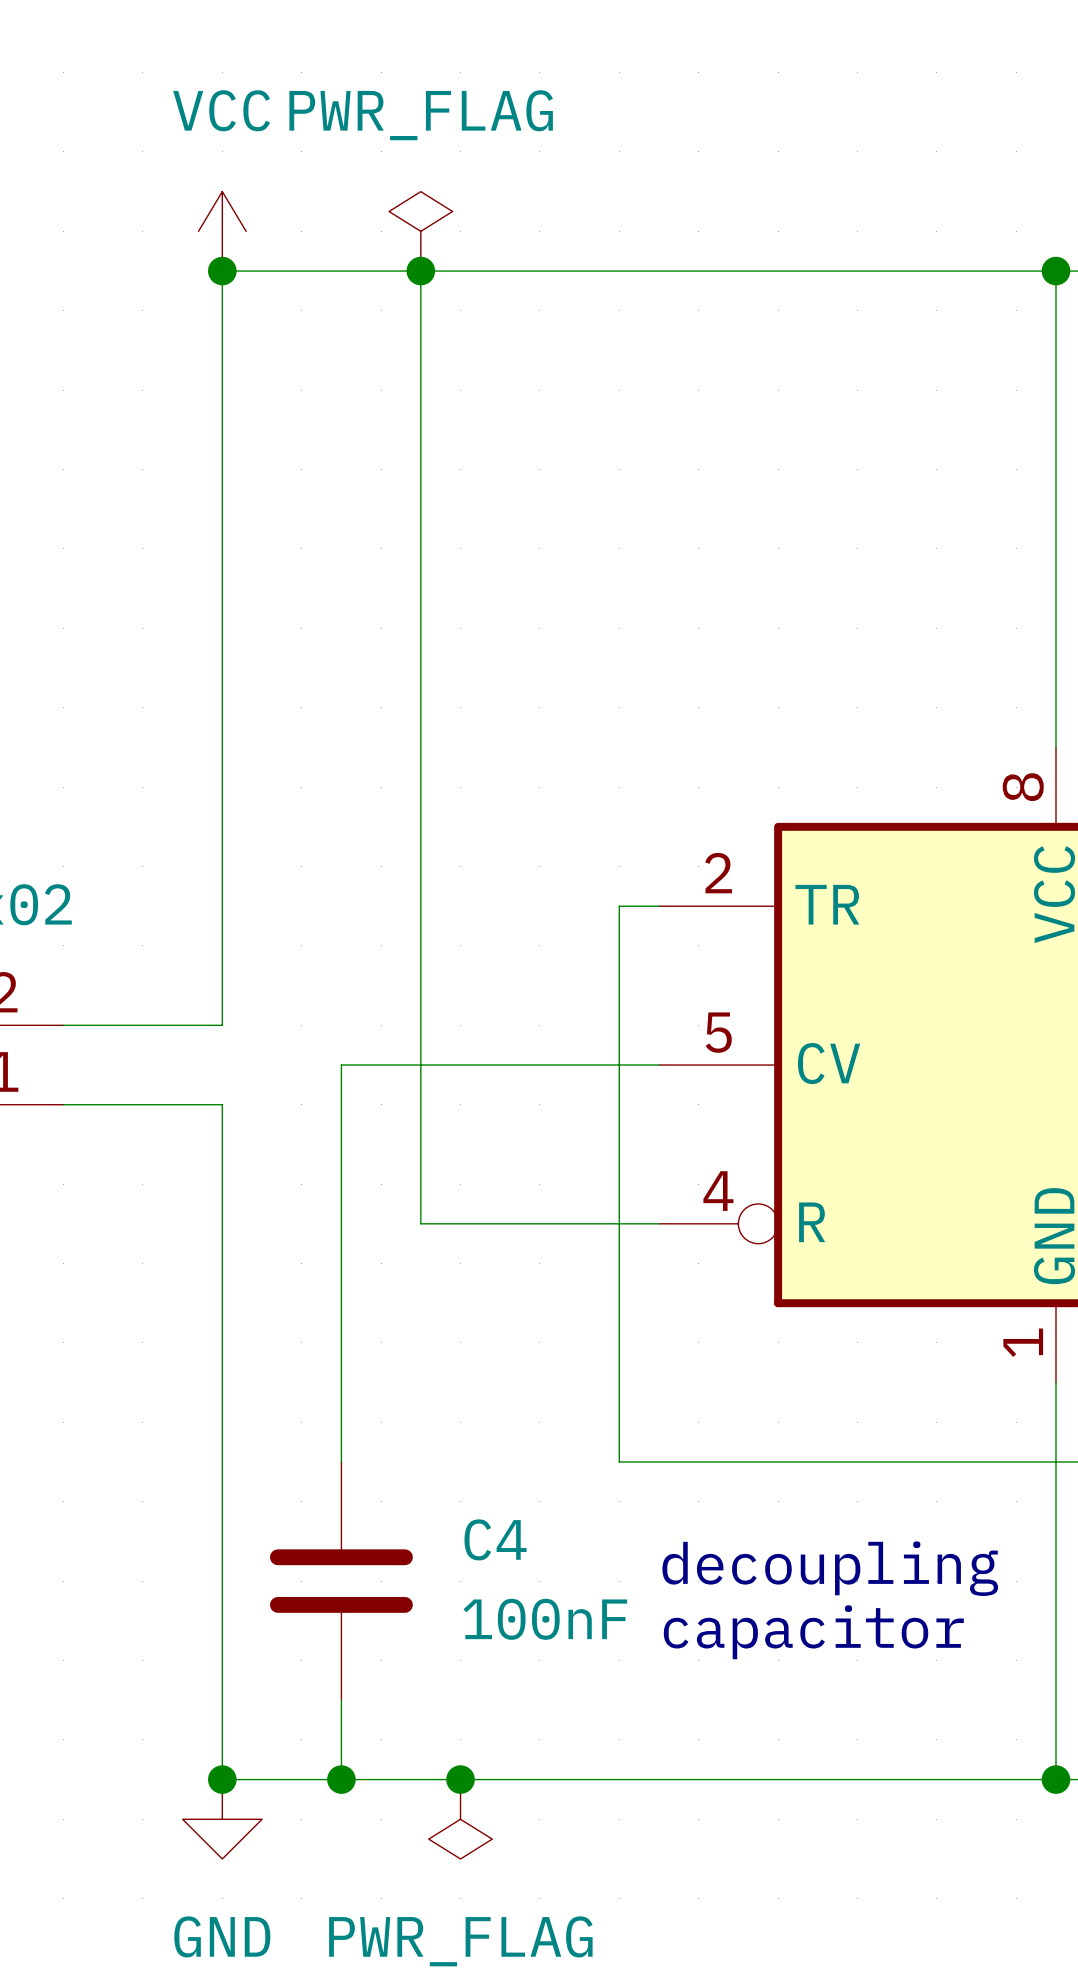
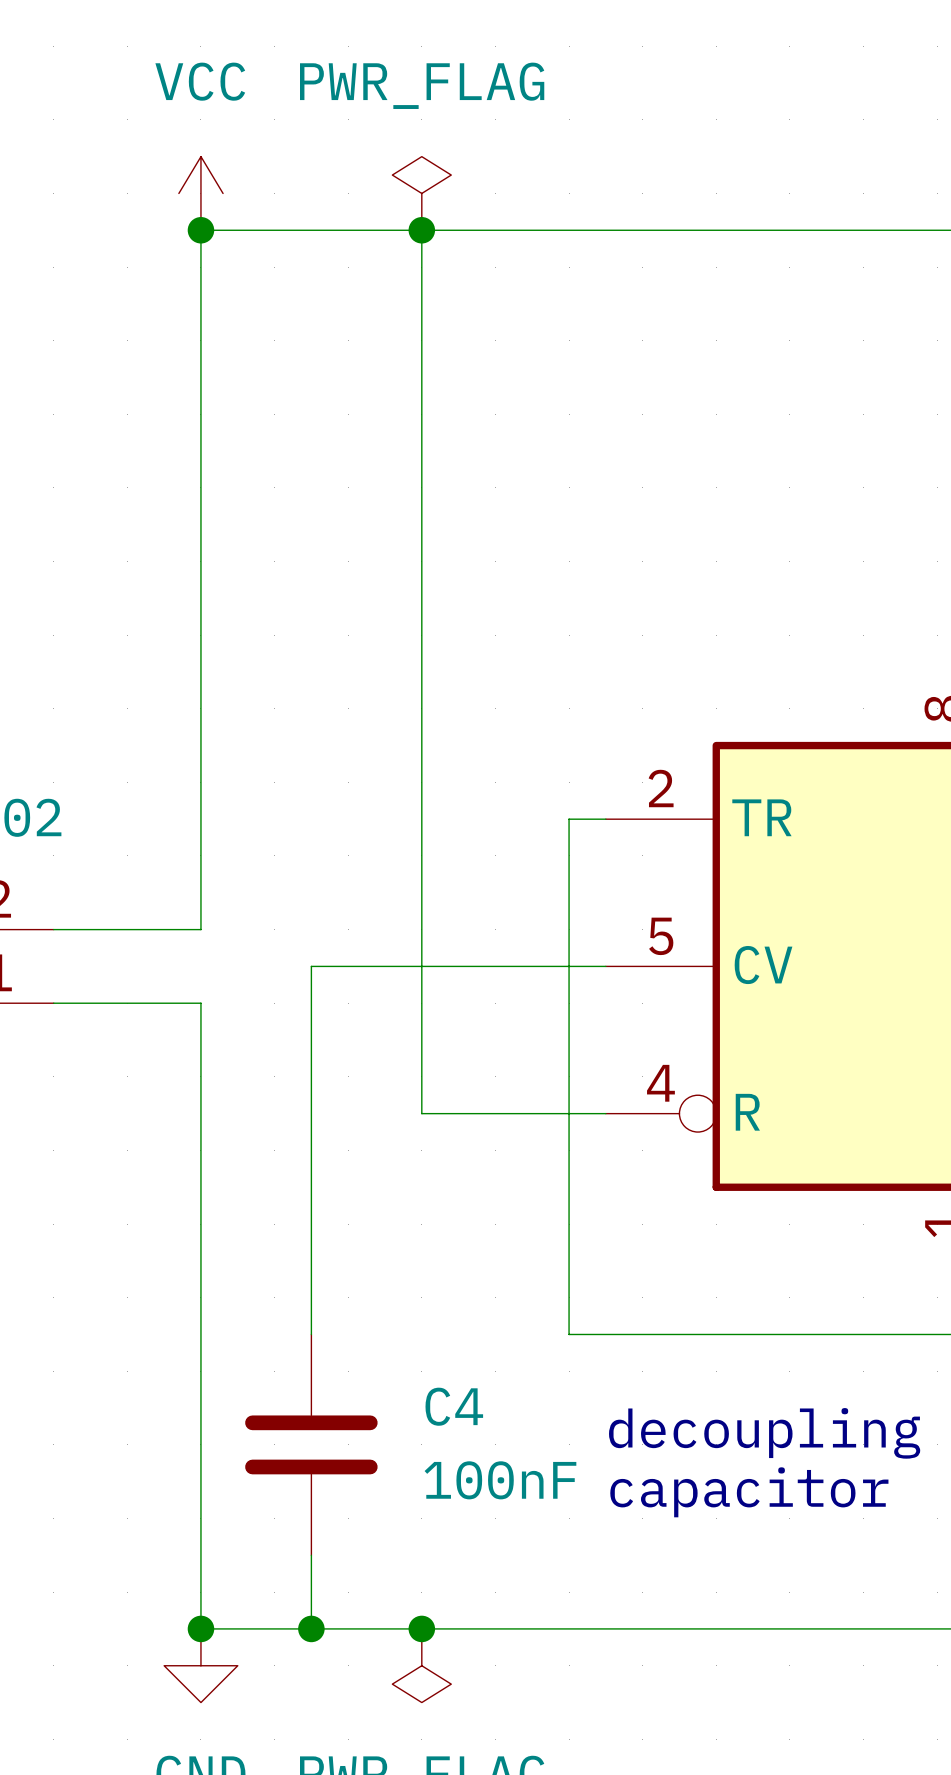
power symbol position: PWR_FLAG (420, 231) -> PWR_FLAG (421, 193)
wire: (420, 271) (420, 1223) (460, 1223) -> (421, 230) (421, 1113)
junction position: (420, 271) -> (421, 230)

